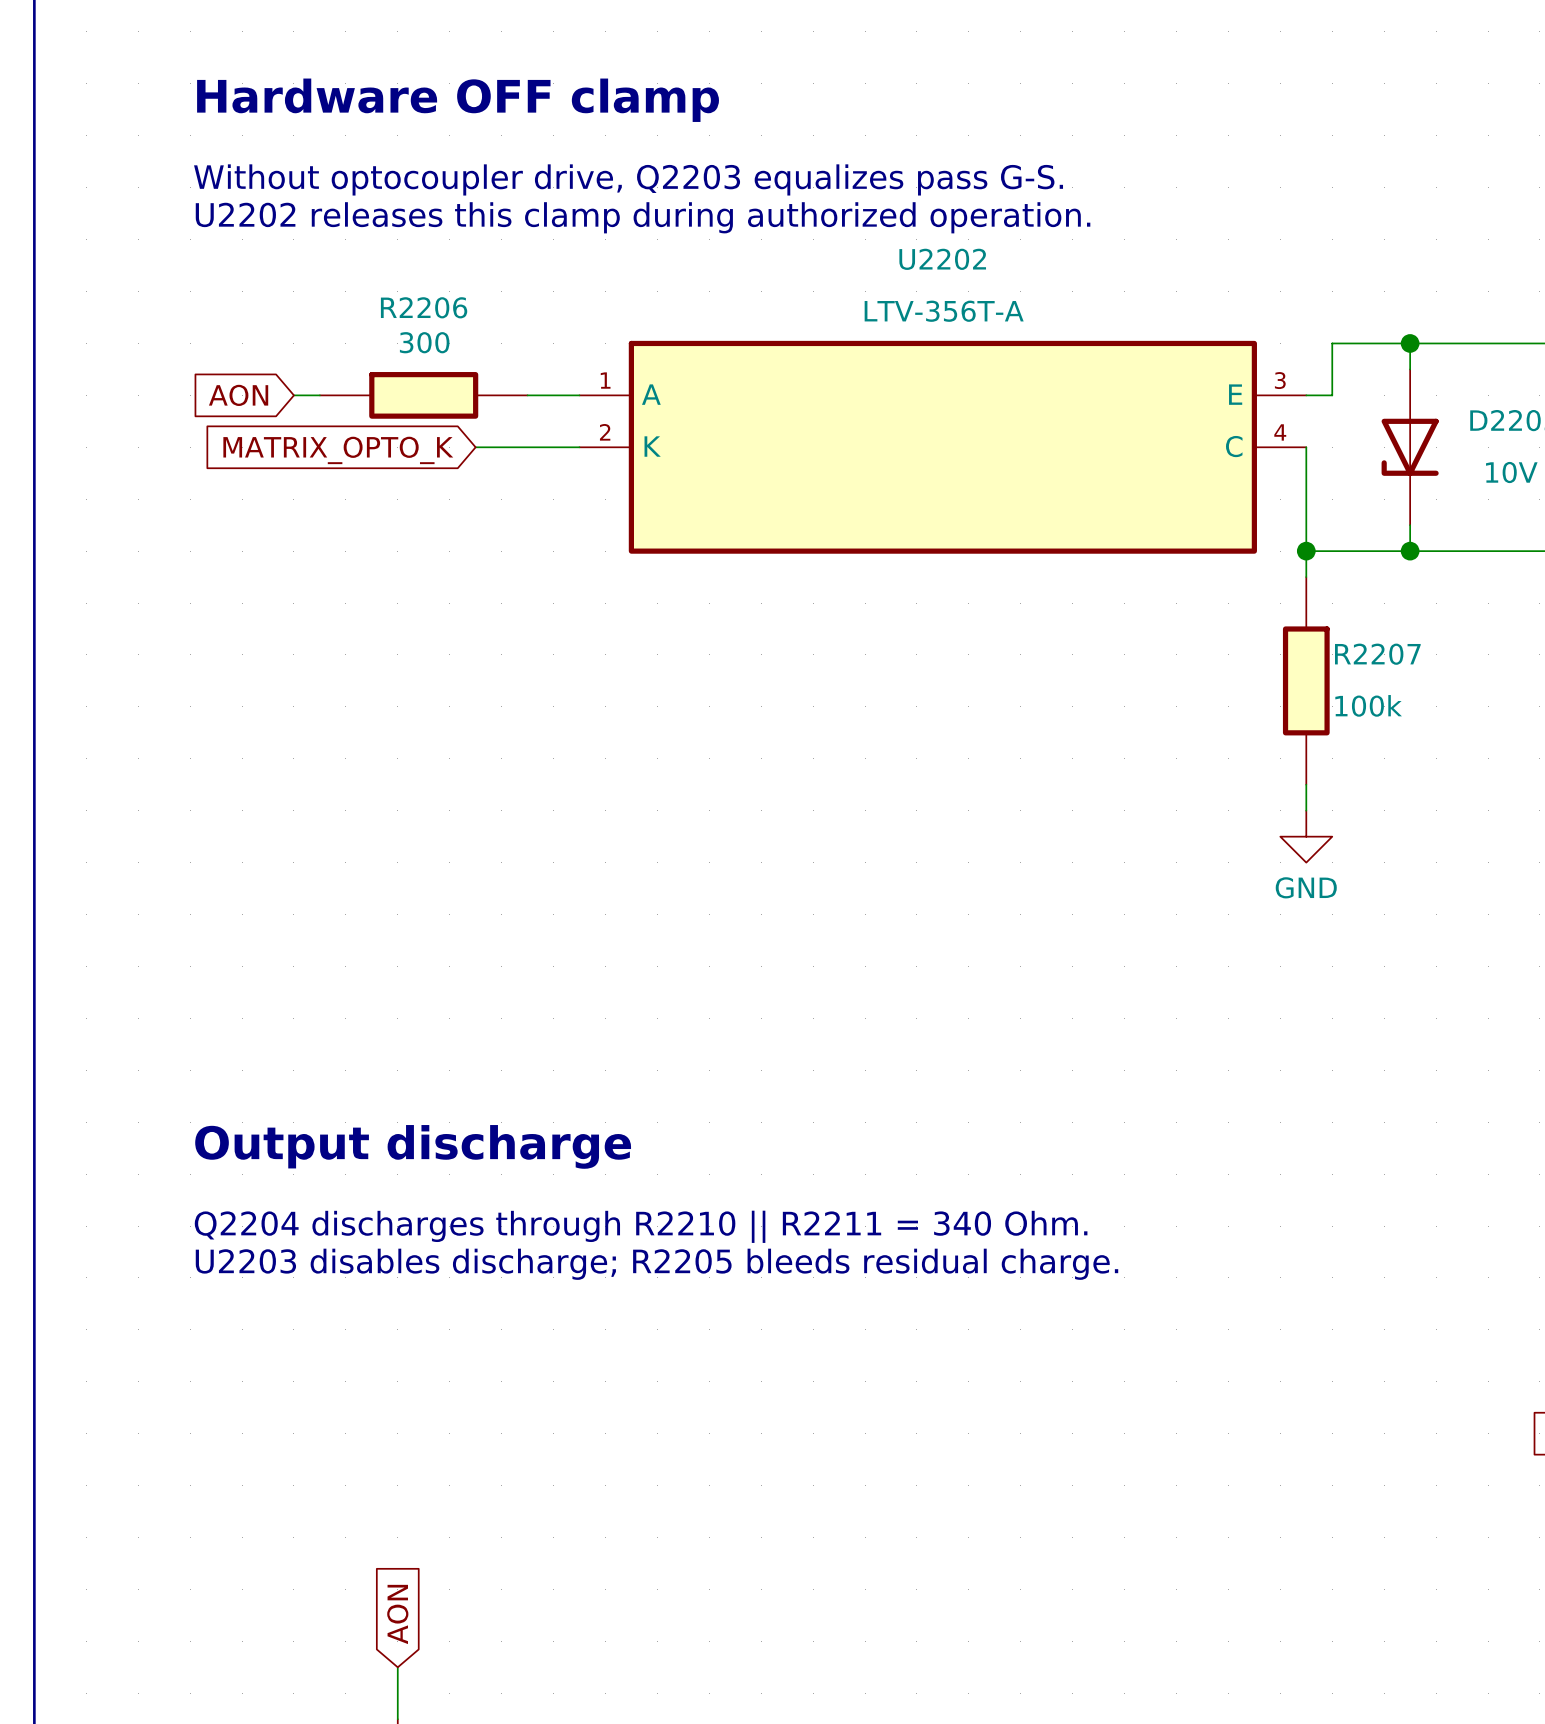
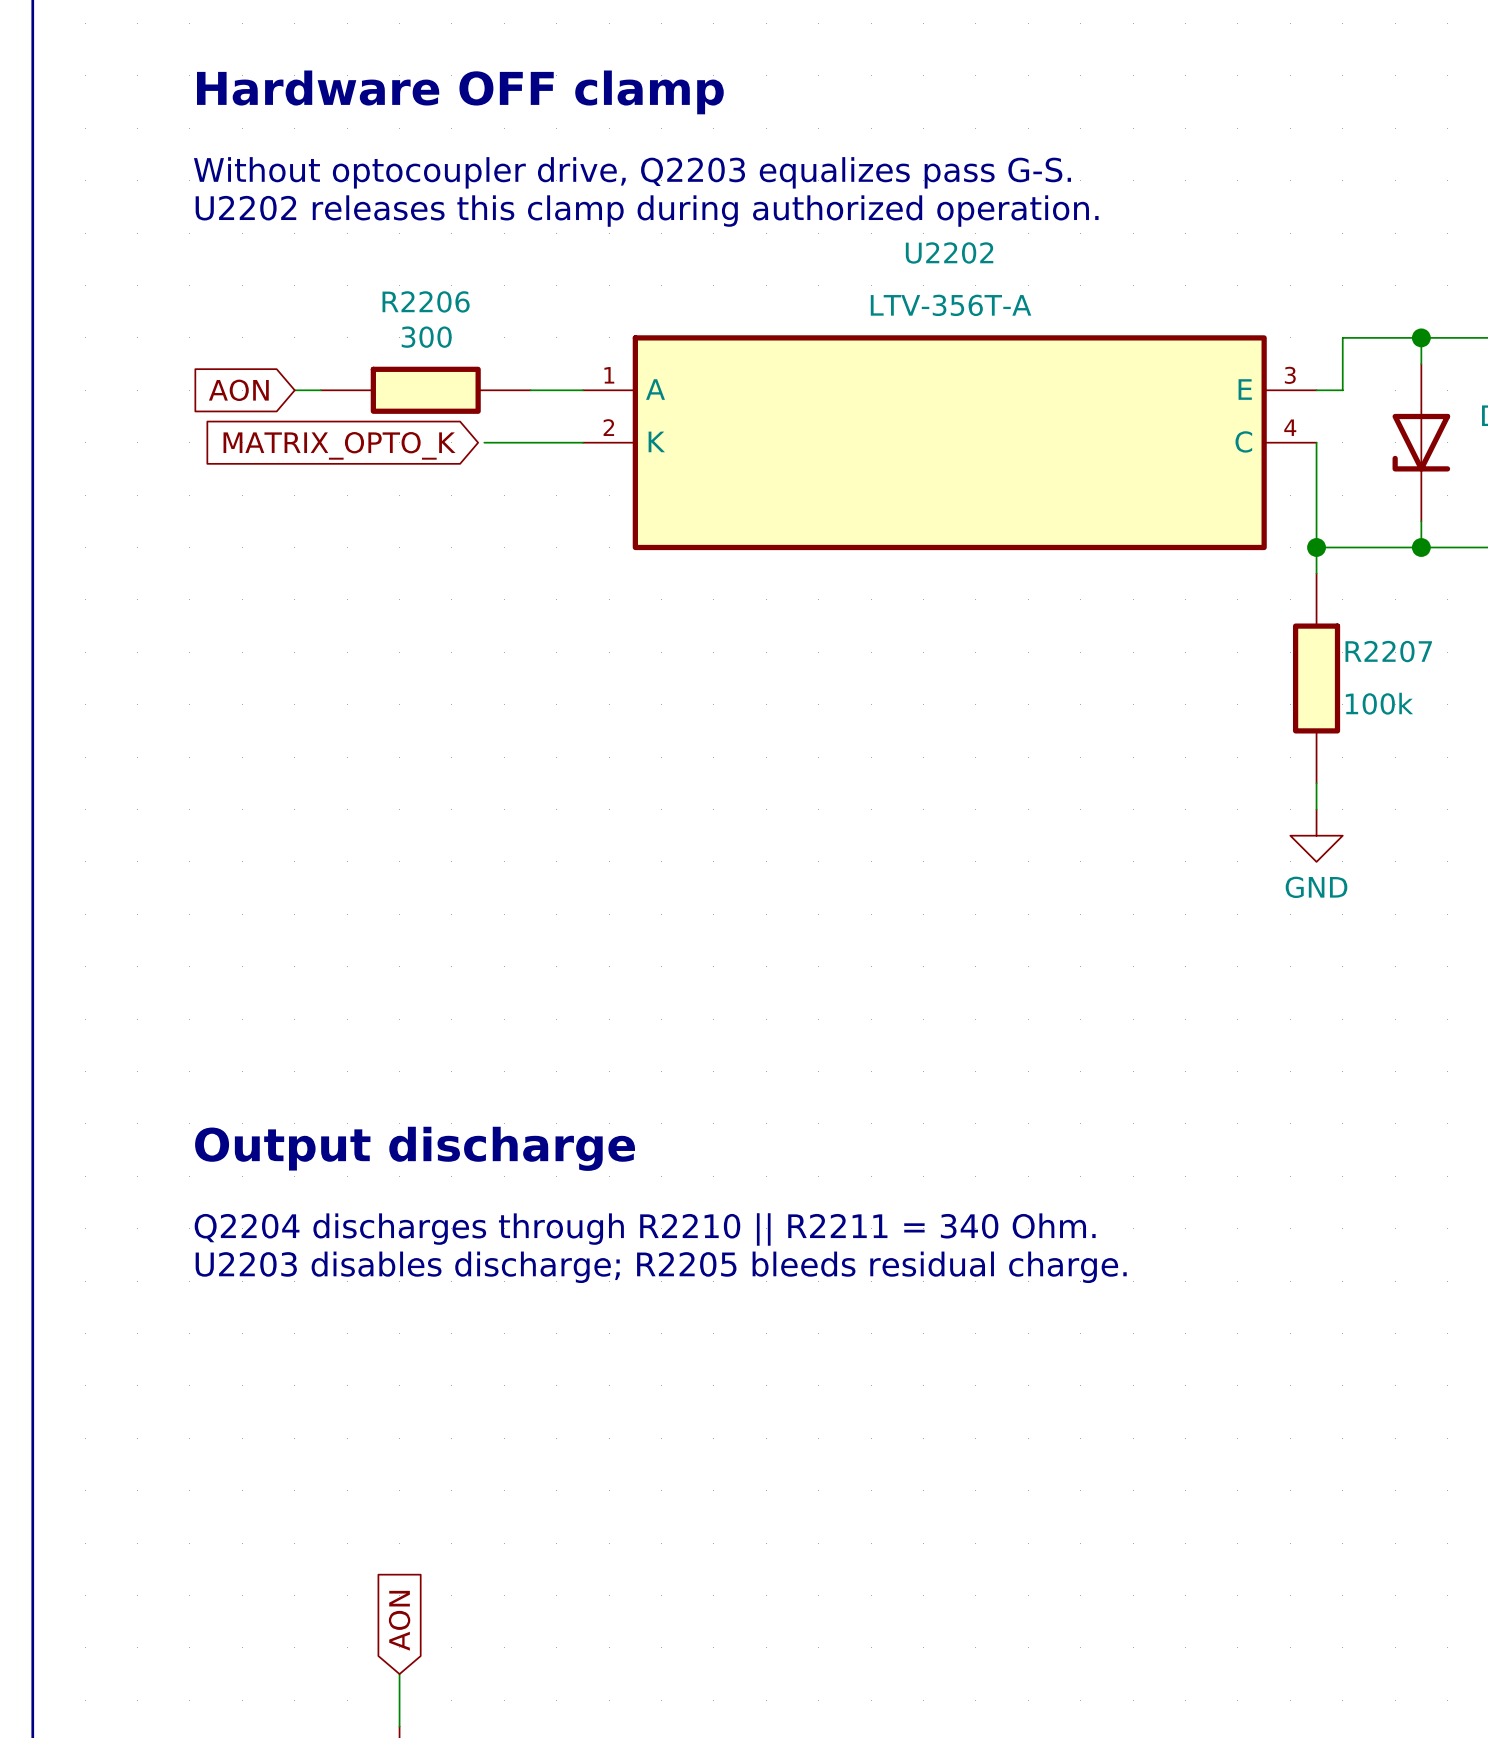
wire: (475, 447) (481, 447) -> none

